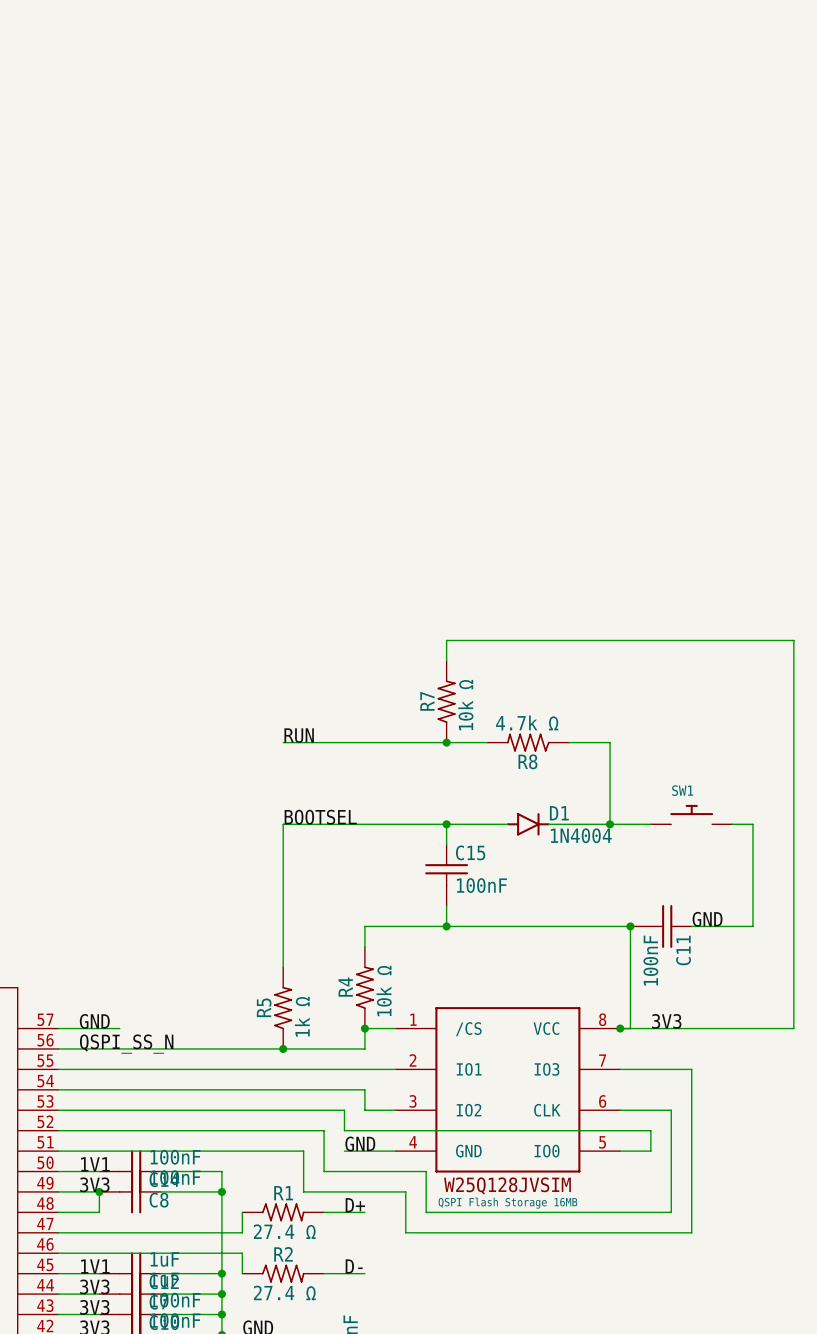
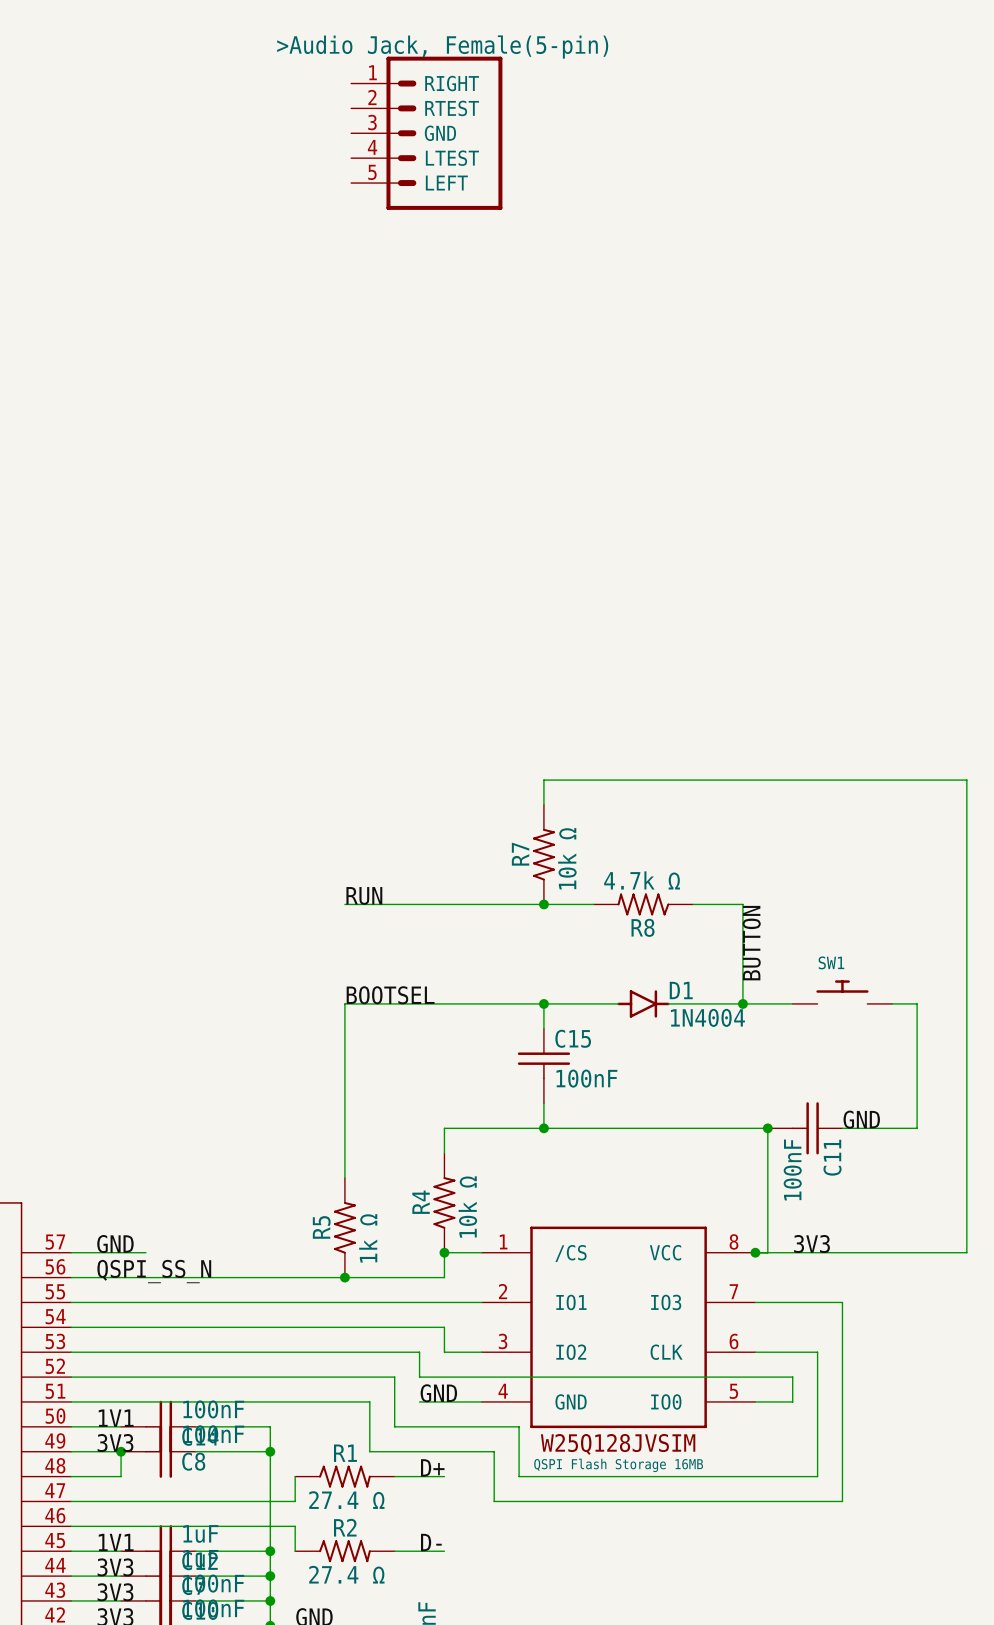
part: none -> (426, 133)
label: none -> BUTTON (751, 943)

